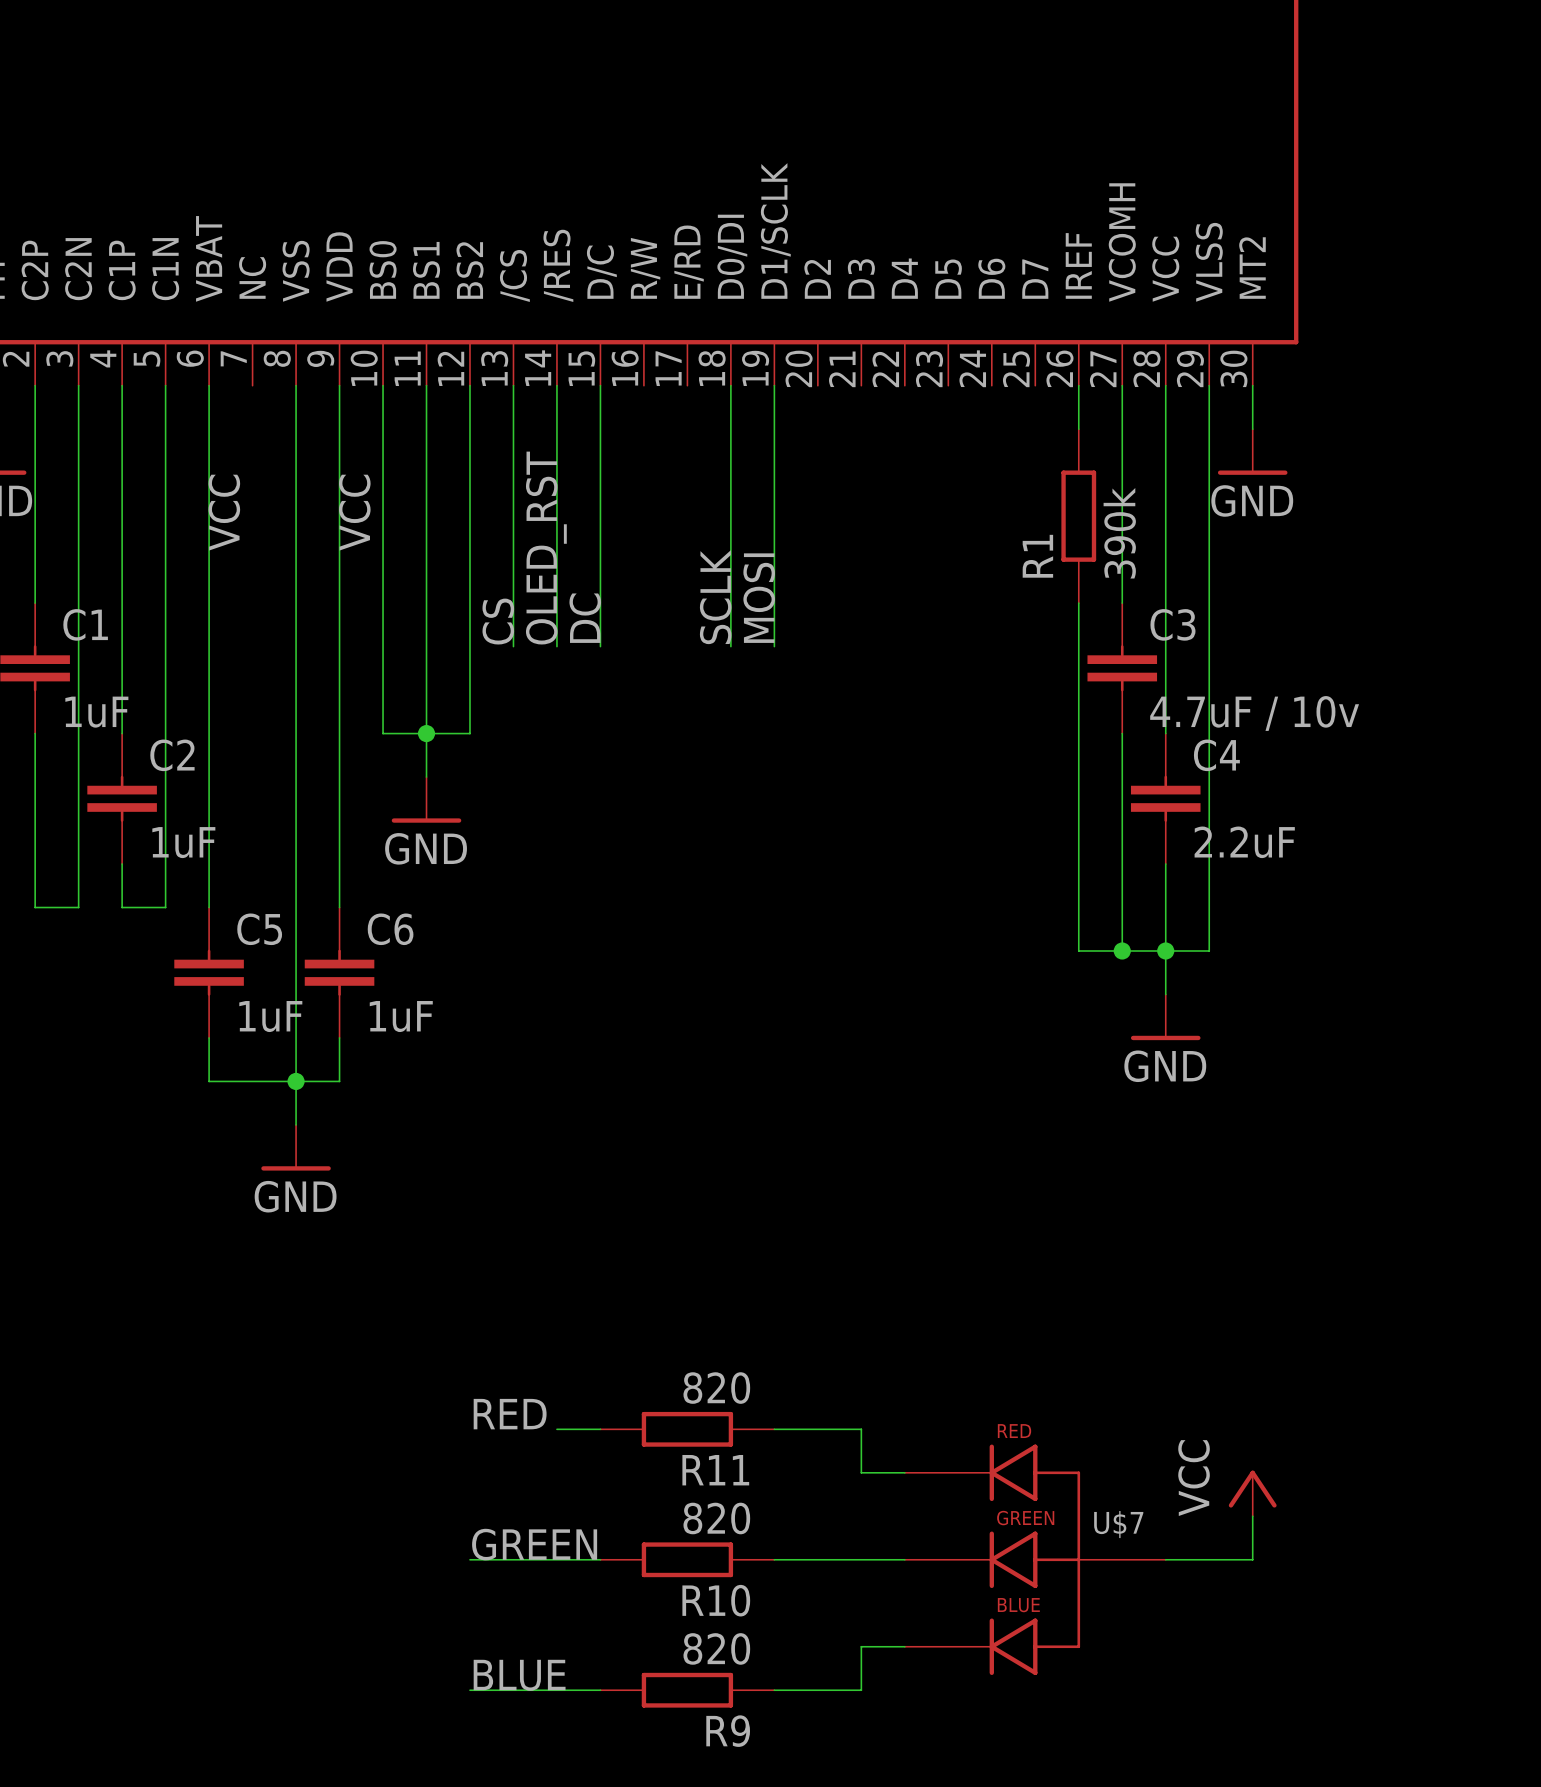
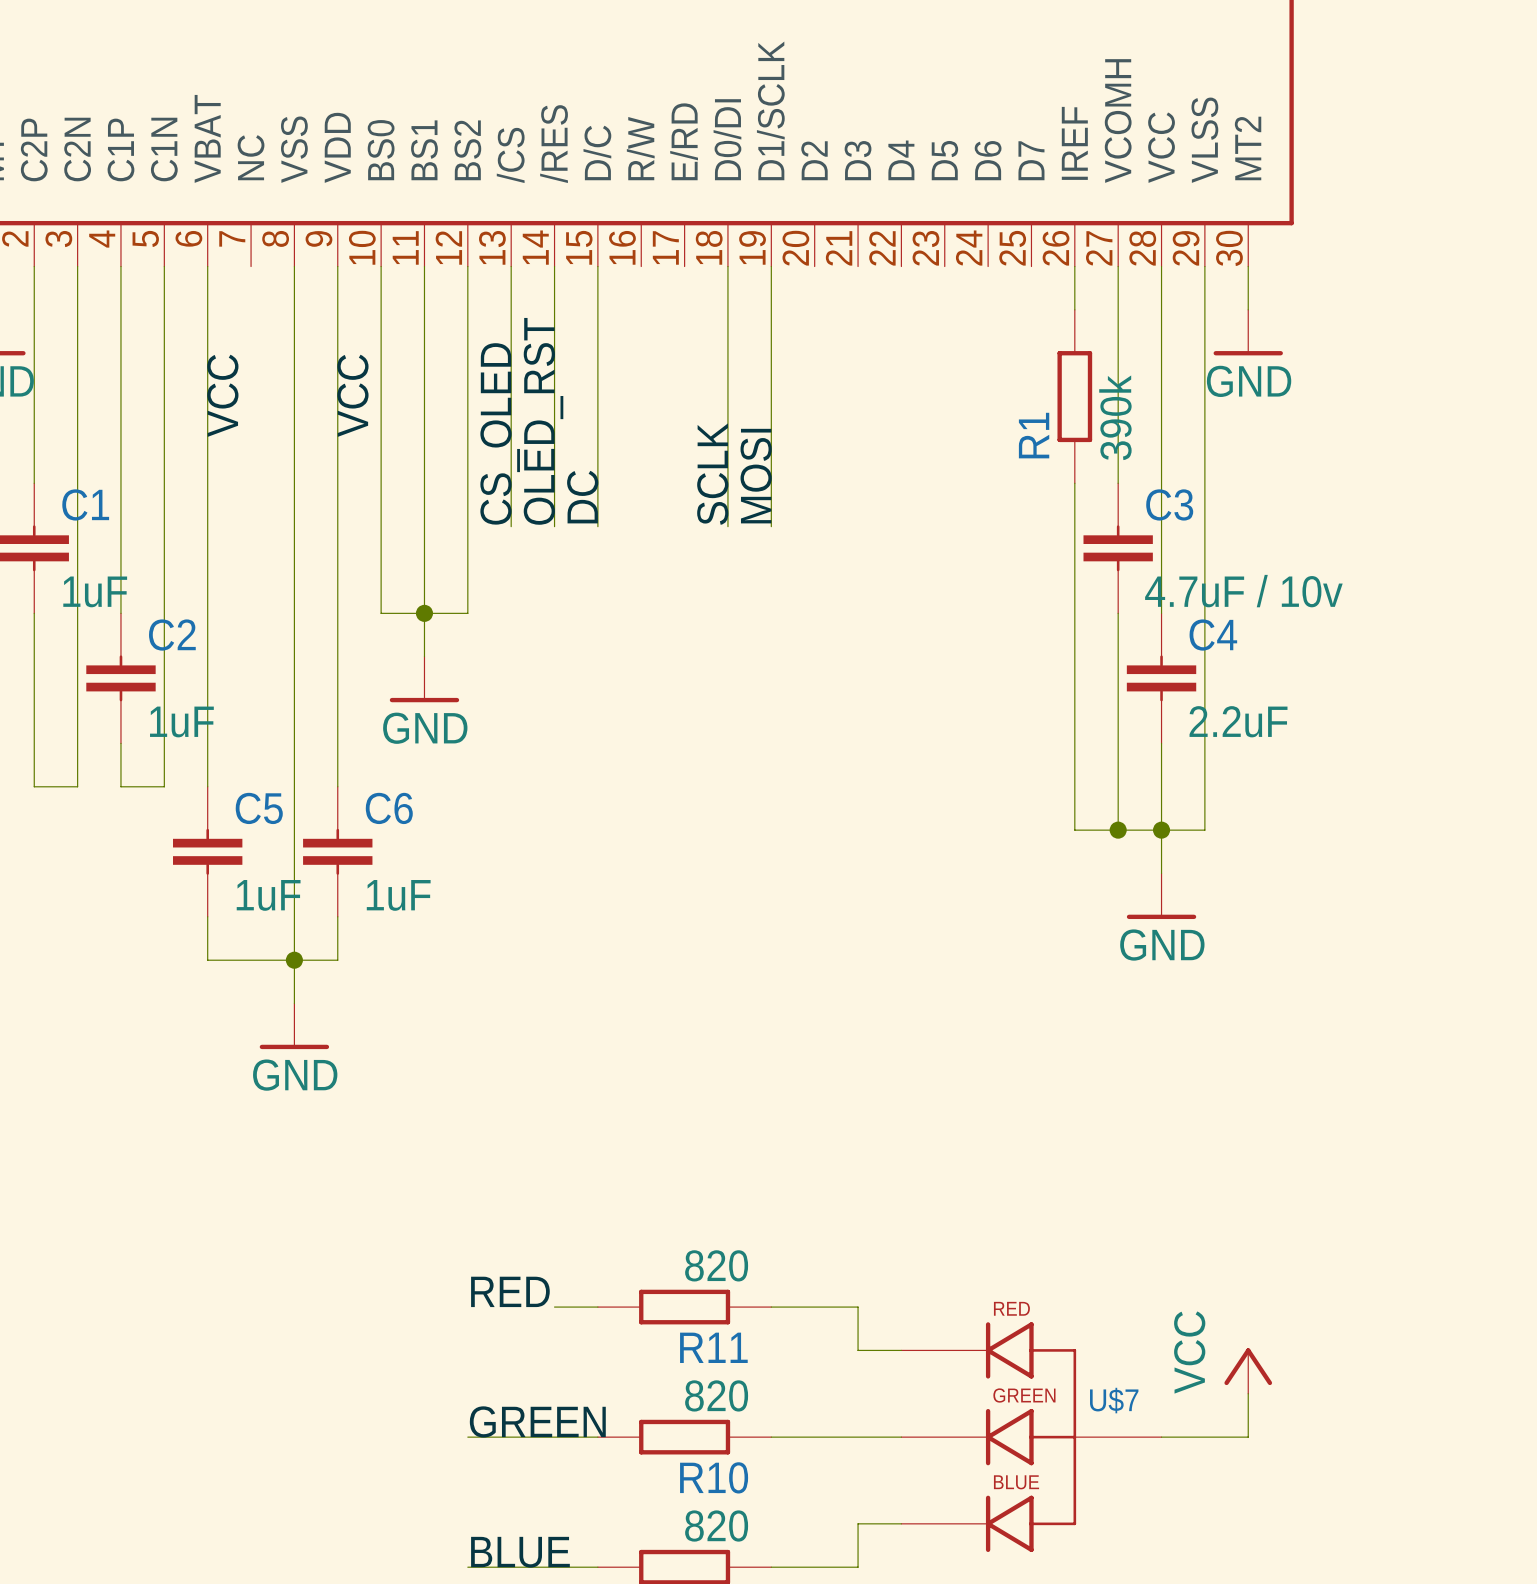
label: CS (498, 621) -> CS_OLED (500, 433)

